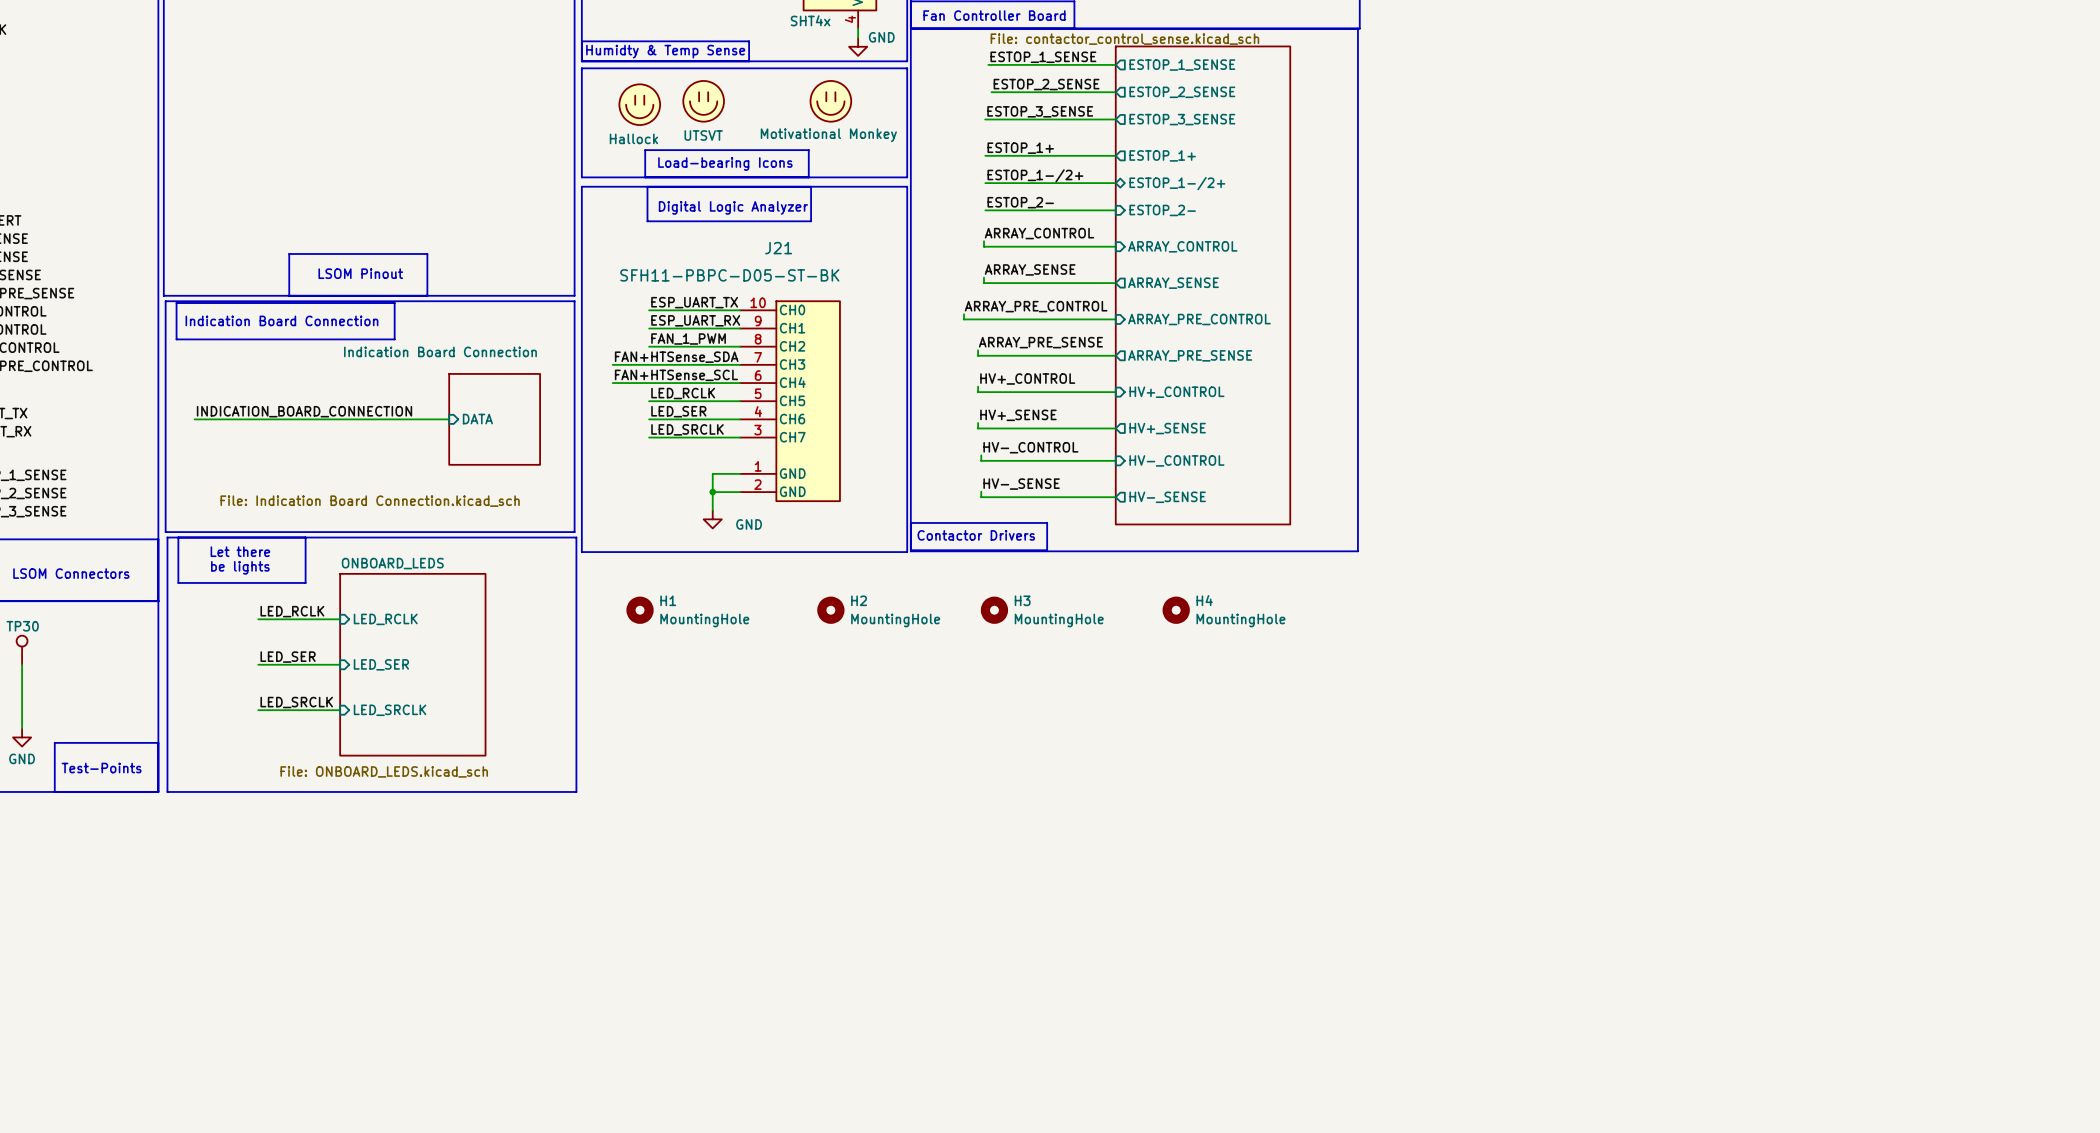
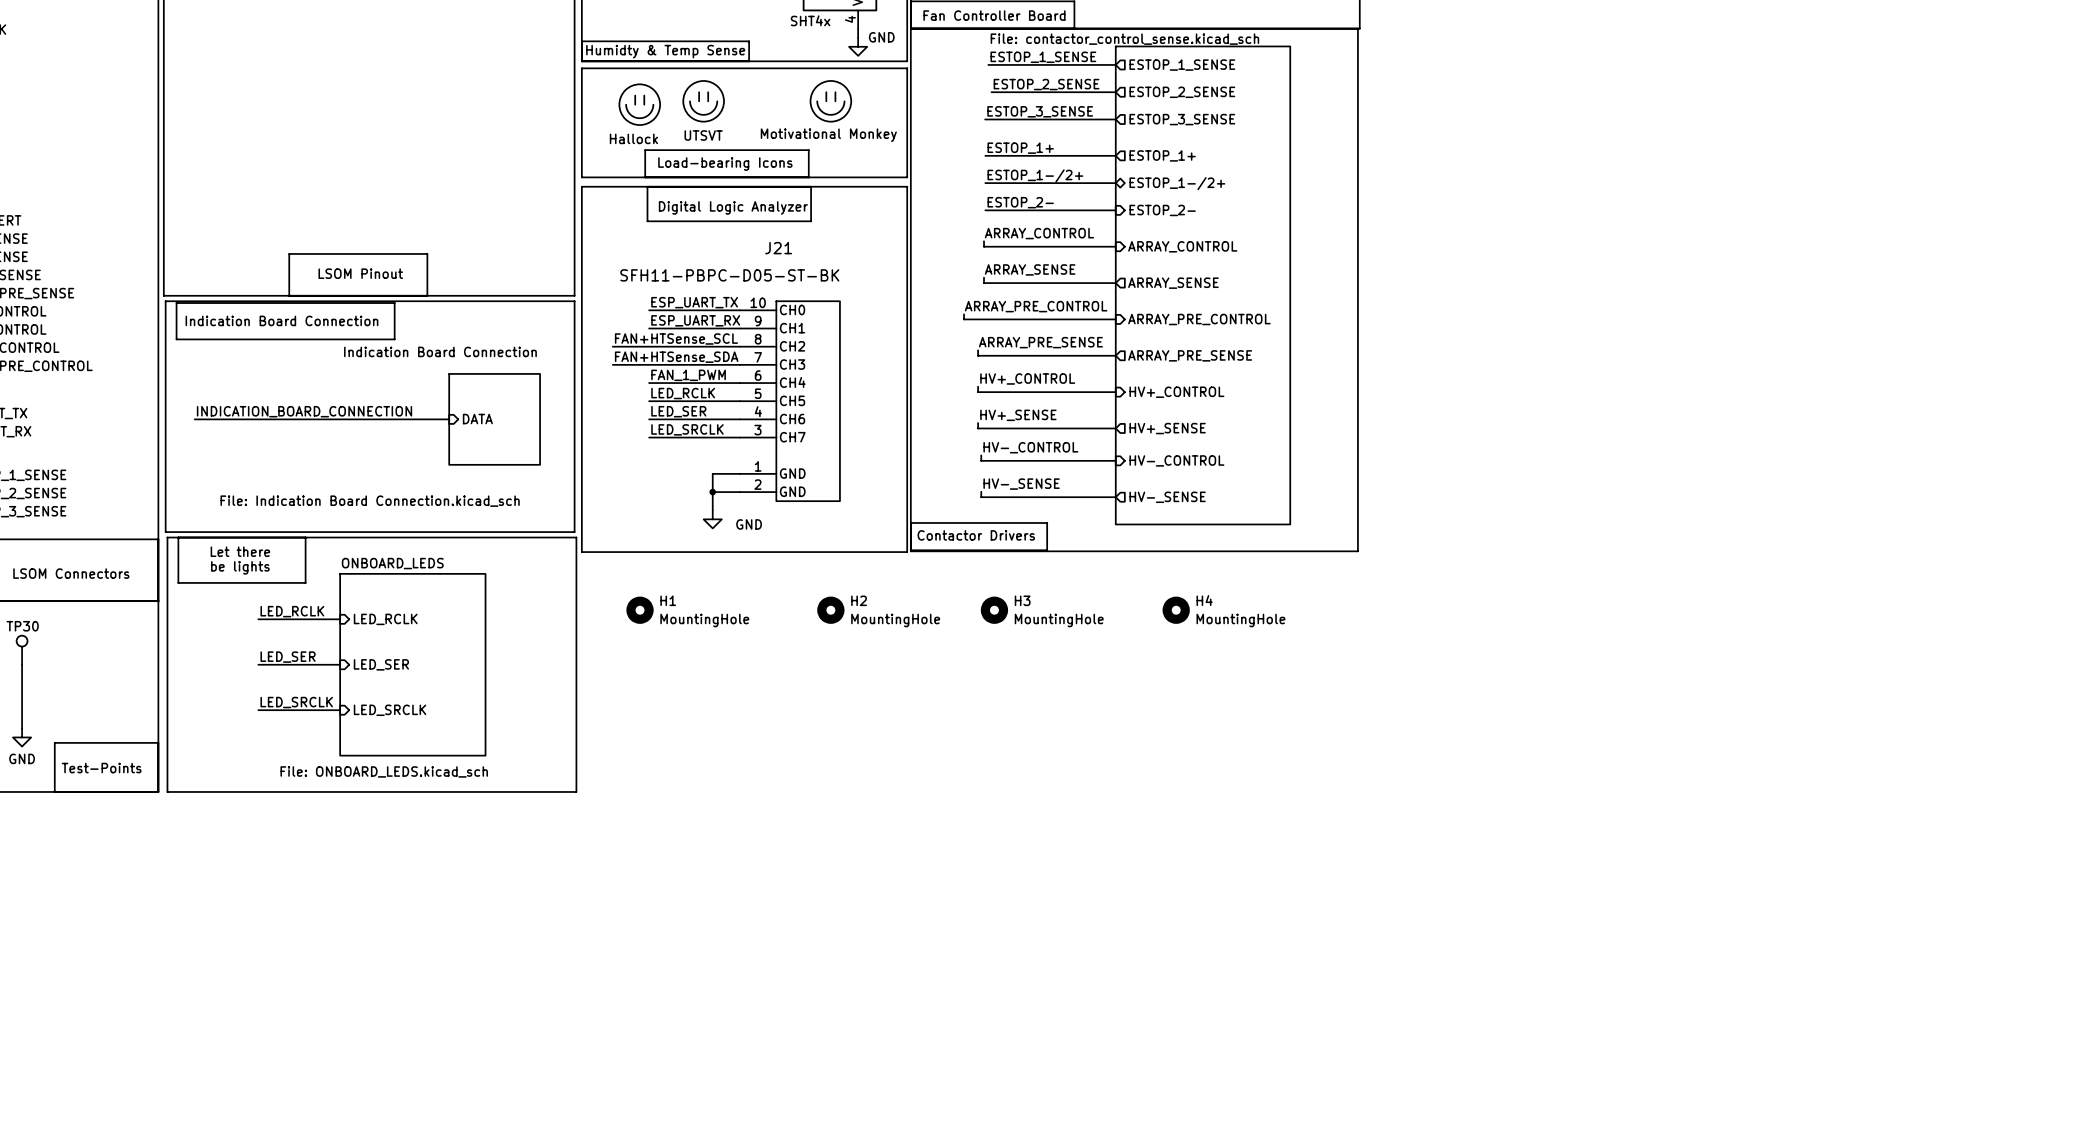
label position: FAN_1_PWM (688, 339) -> FAN_1_PWM (688, 375)
label position: FAN+HTSense_SCL (676, 375) -> FAN+HTSense_SCL (676, 339)
wire: (612, 383) (649, 383) -> (612, 346) (649, 346)

